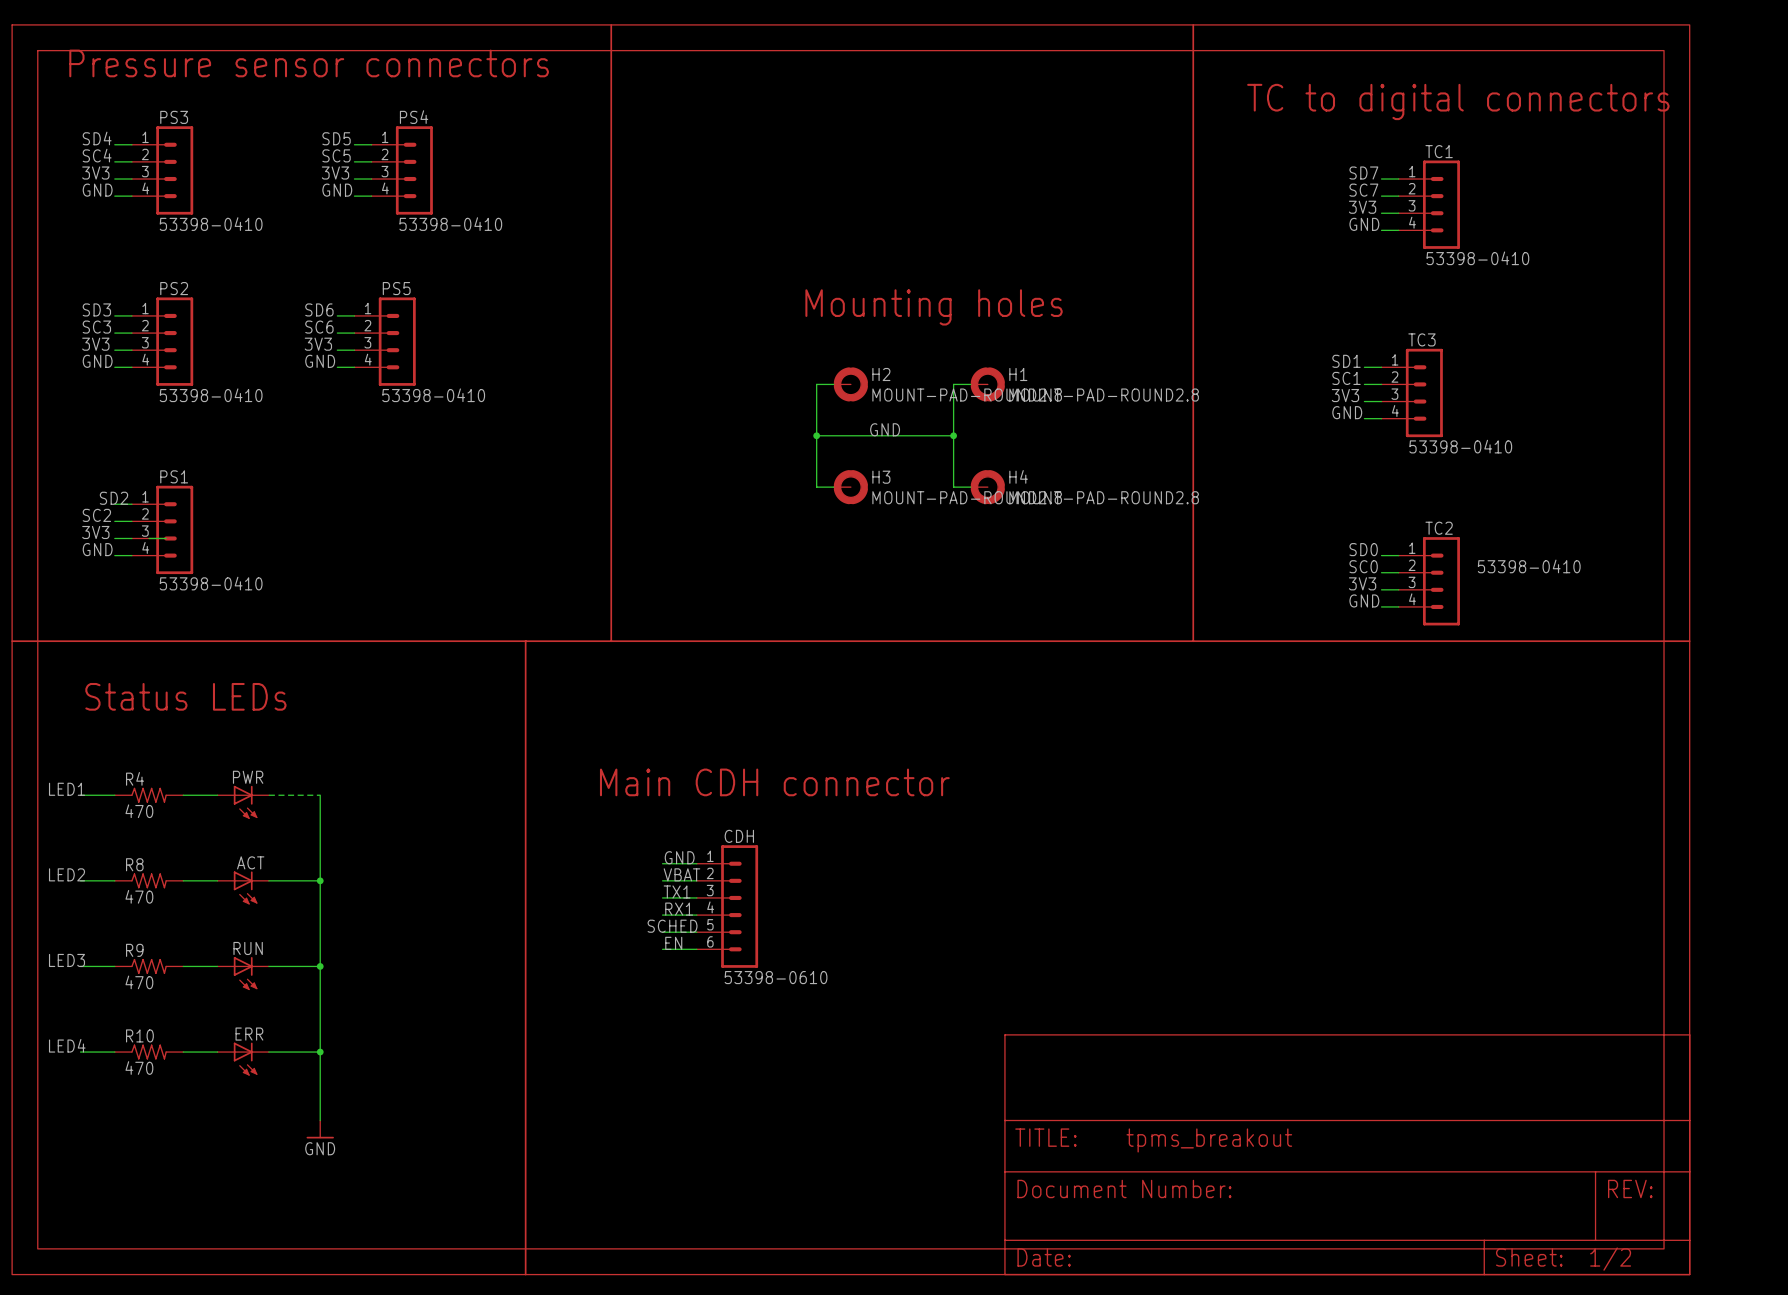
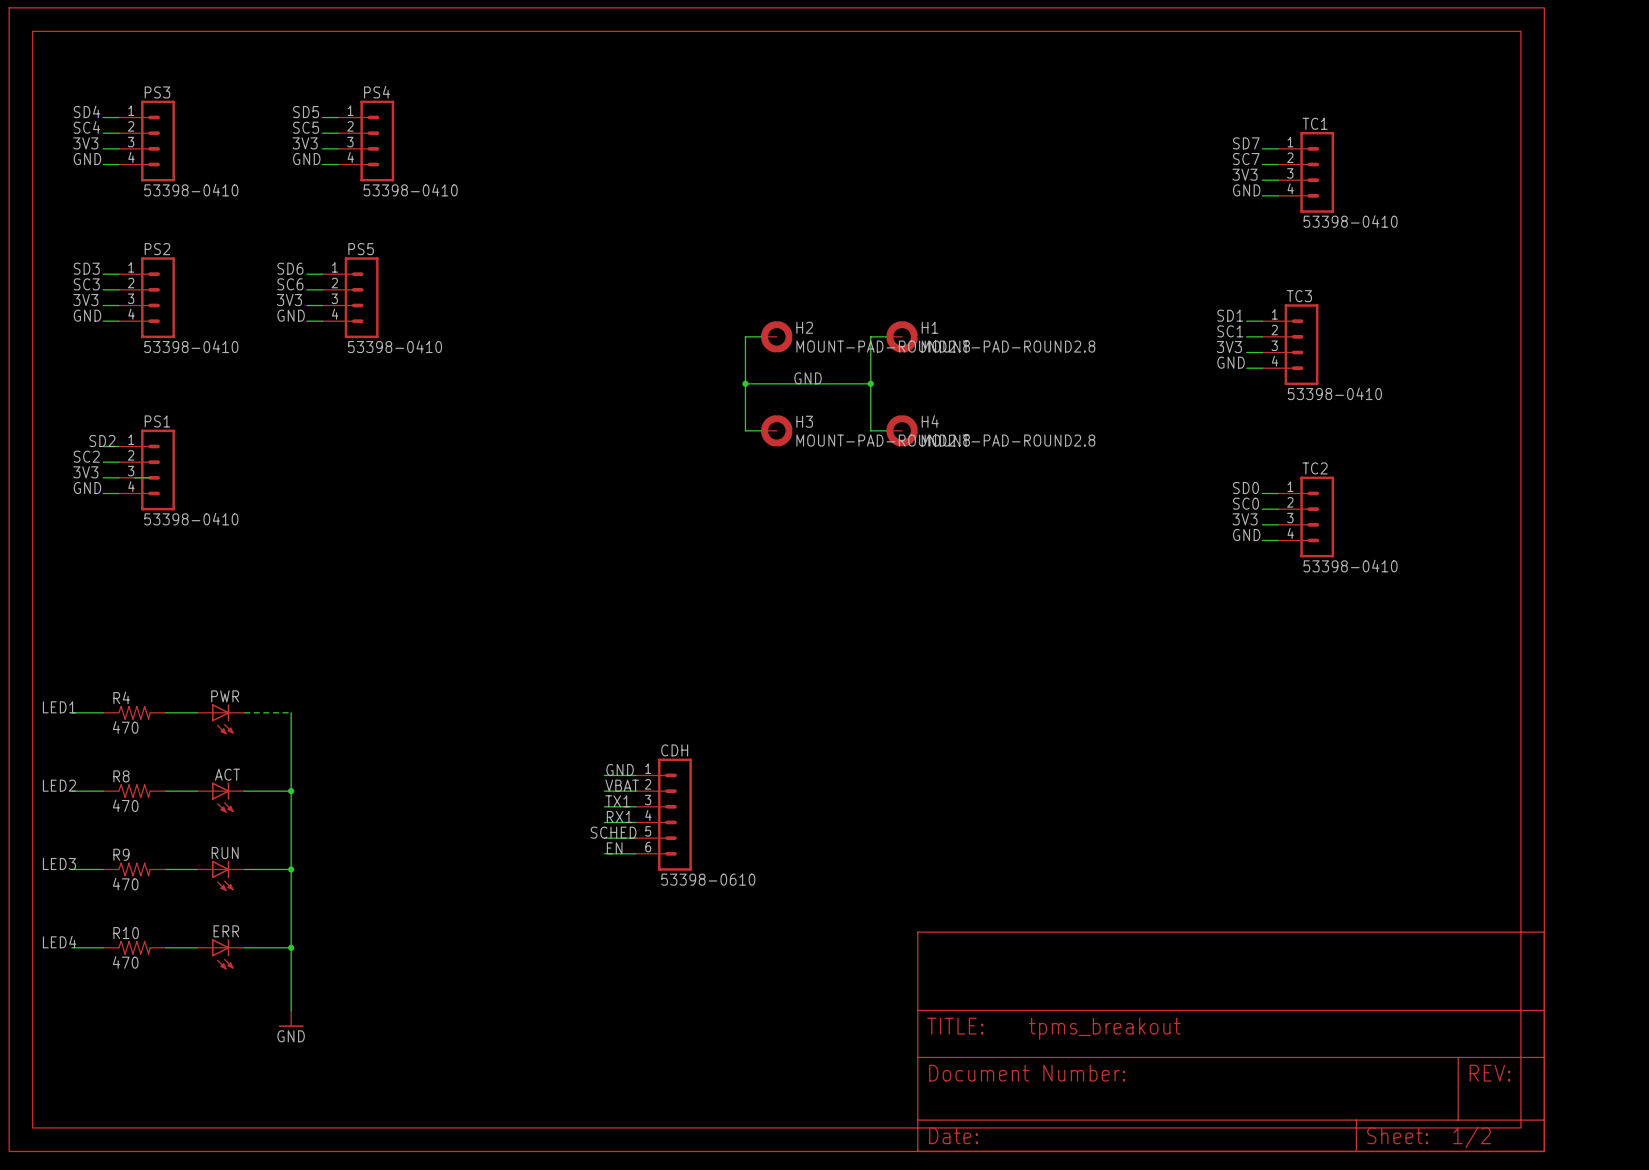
line: (611, 24) (611, 641) -> none
line: (1193, 24) (1193, 641) -> none
text: Pressure sensor connectors (309, 63) -> none
text: TC to digital connectors (1458, 101) -> none
text: Mounting holes (934, 307) -> none
TC2 value position: 53398-0410 (1529, 566) -> 53398-0410 (1350, 566)
line: (12, 641) (1689, 641) -> none
line: (525, 641) (525, 1274) -> none
text: Status LEDs (185, 696) -> none
text: Main CDH connector (774, 782) -> none

